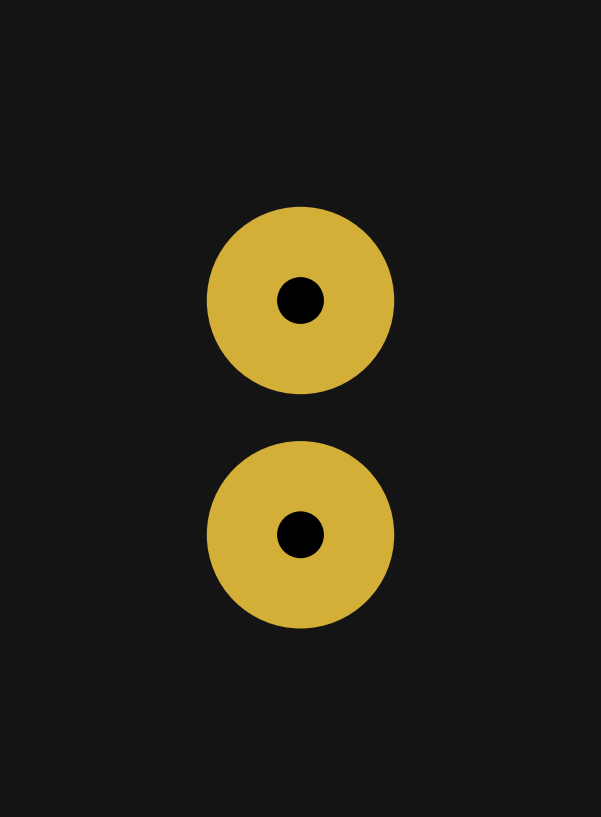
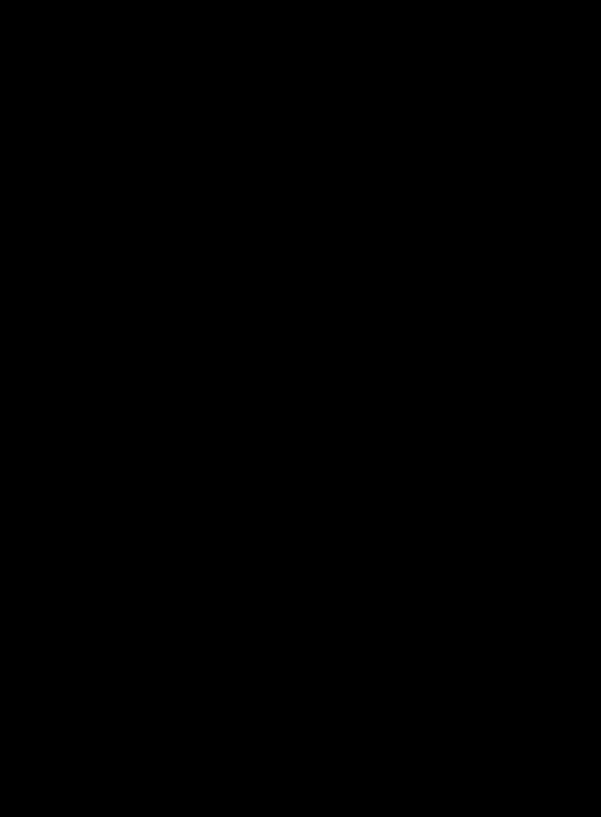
part: (300, 300) -> none
part: (300, 534) -> none

